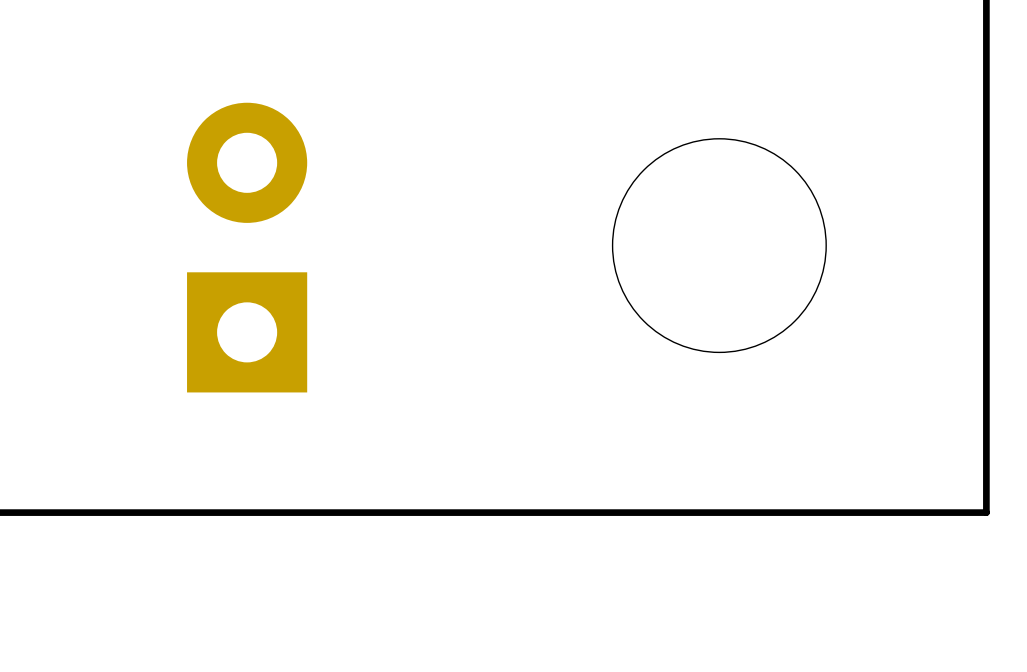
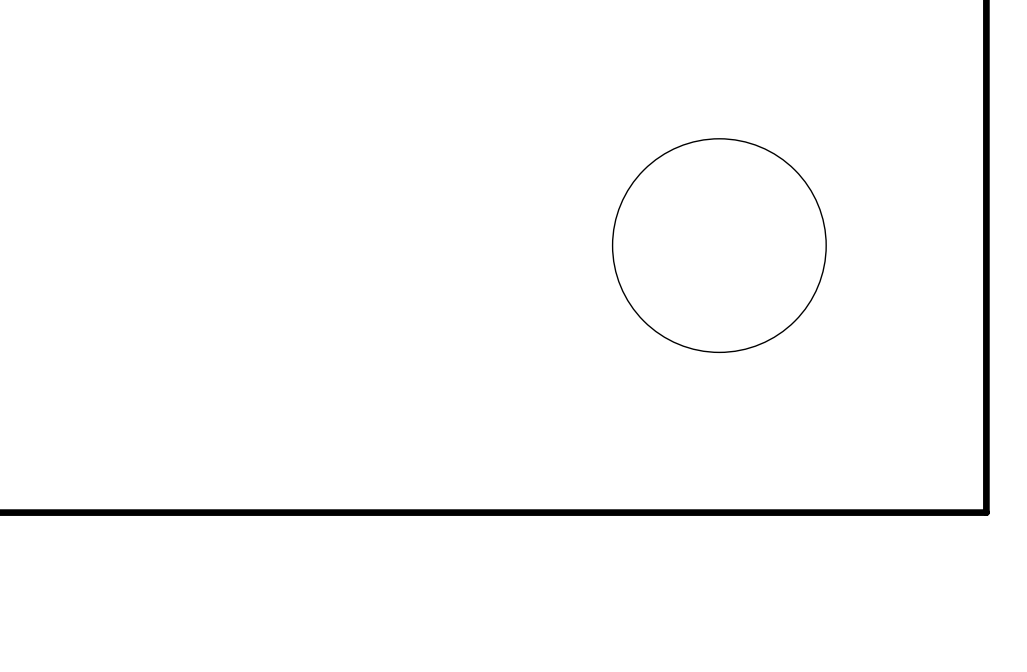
part: (247, 247) -> none

